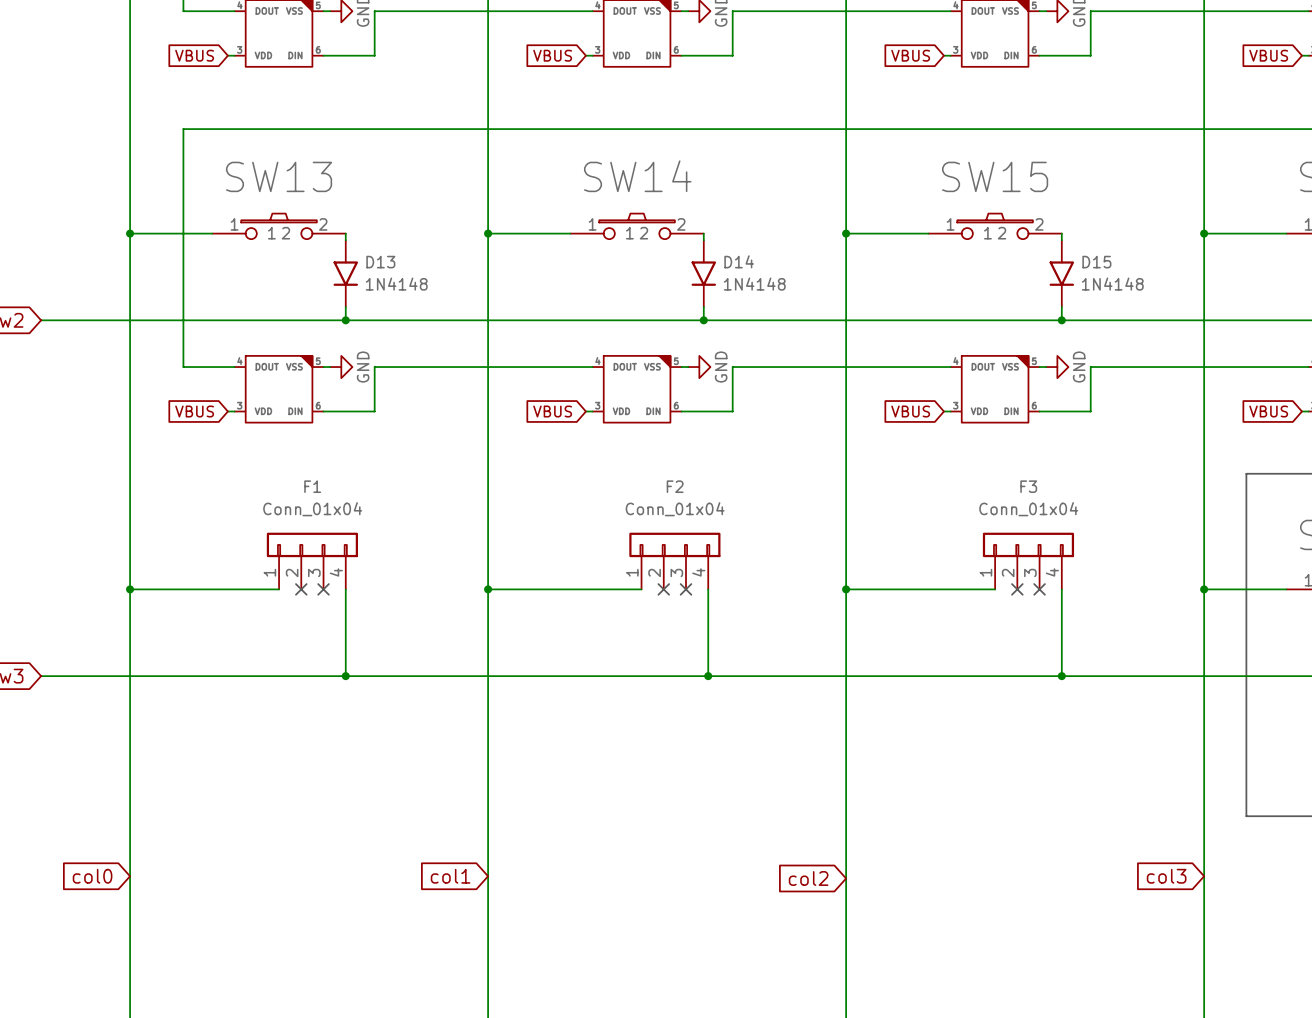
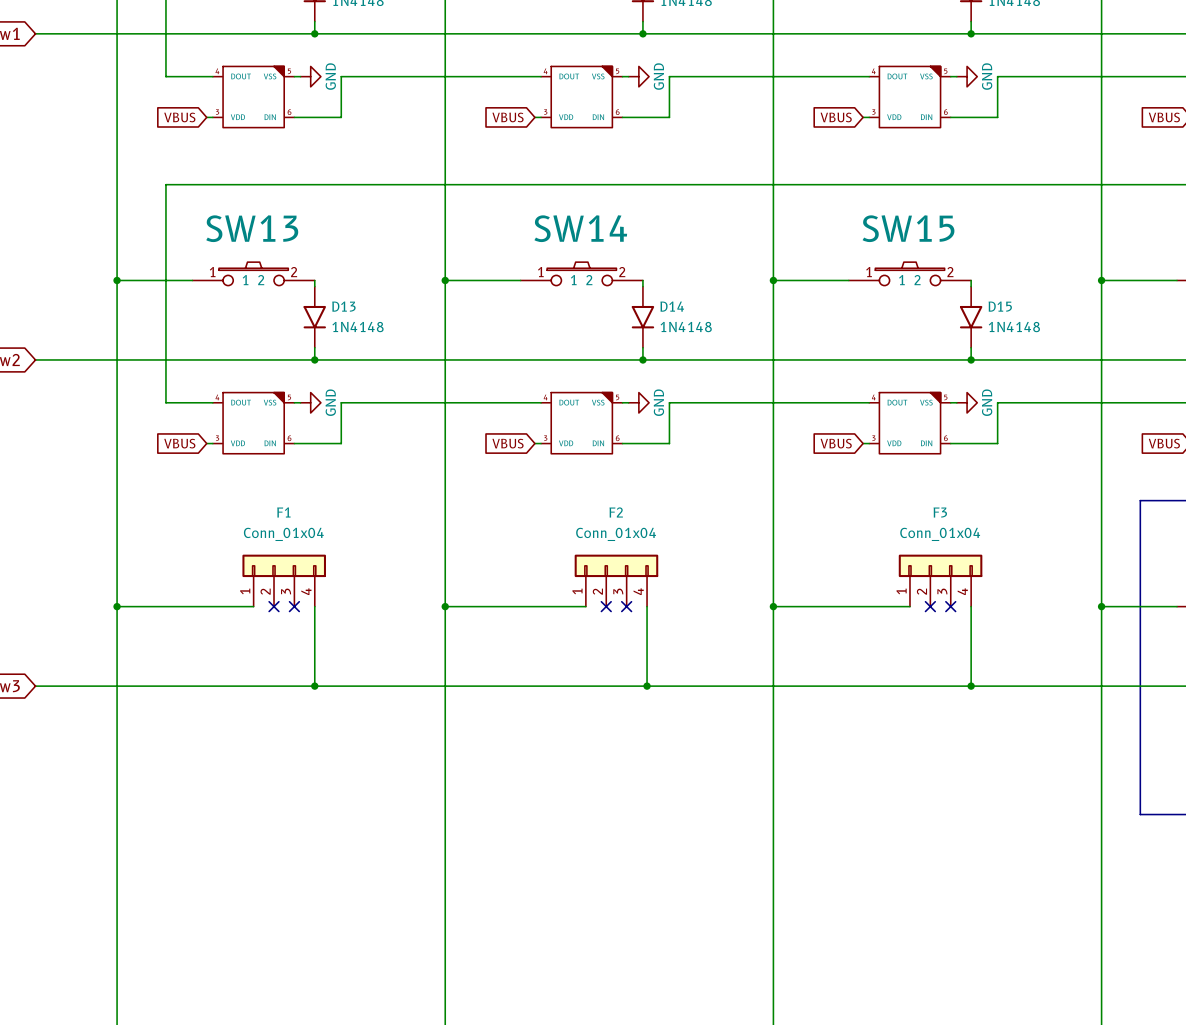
global label: col0 (92, 876) -> none
global label: col1 (450, 876) -> none
global label: col3 (1166, 876) -> none
global label: col2 (808, 878) -> none

